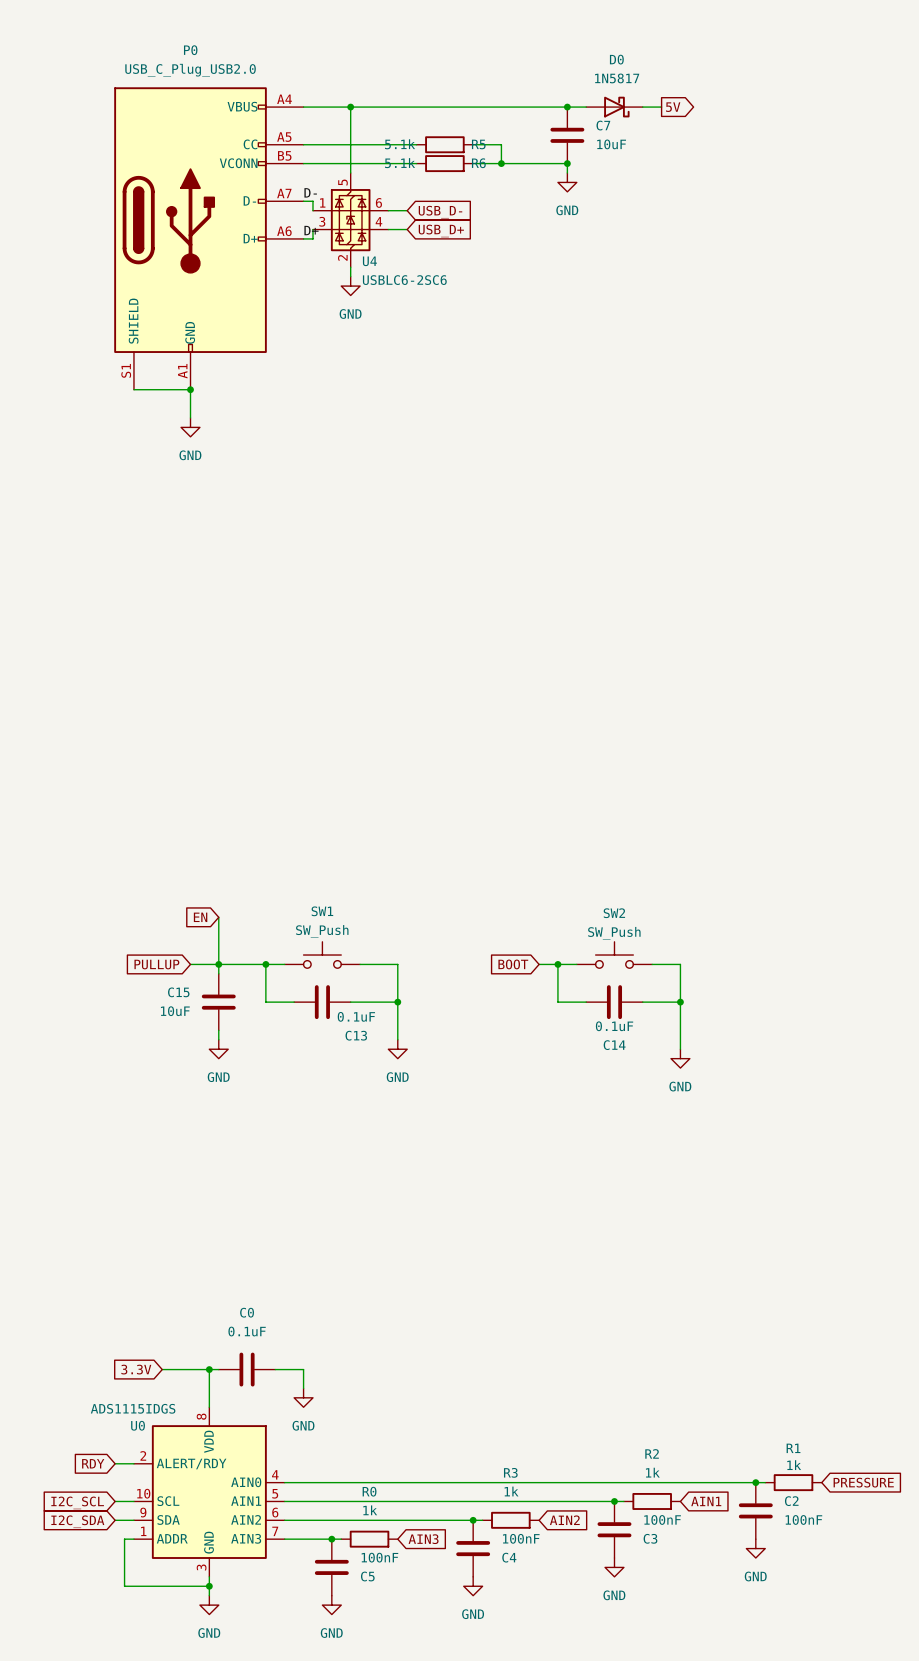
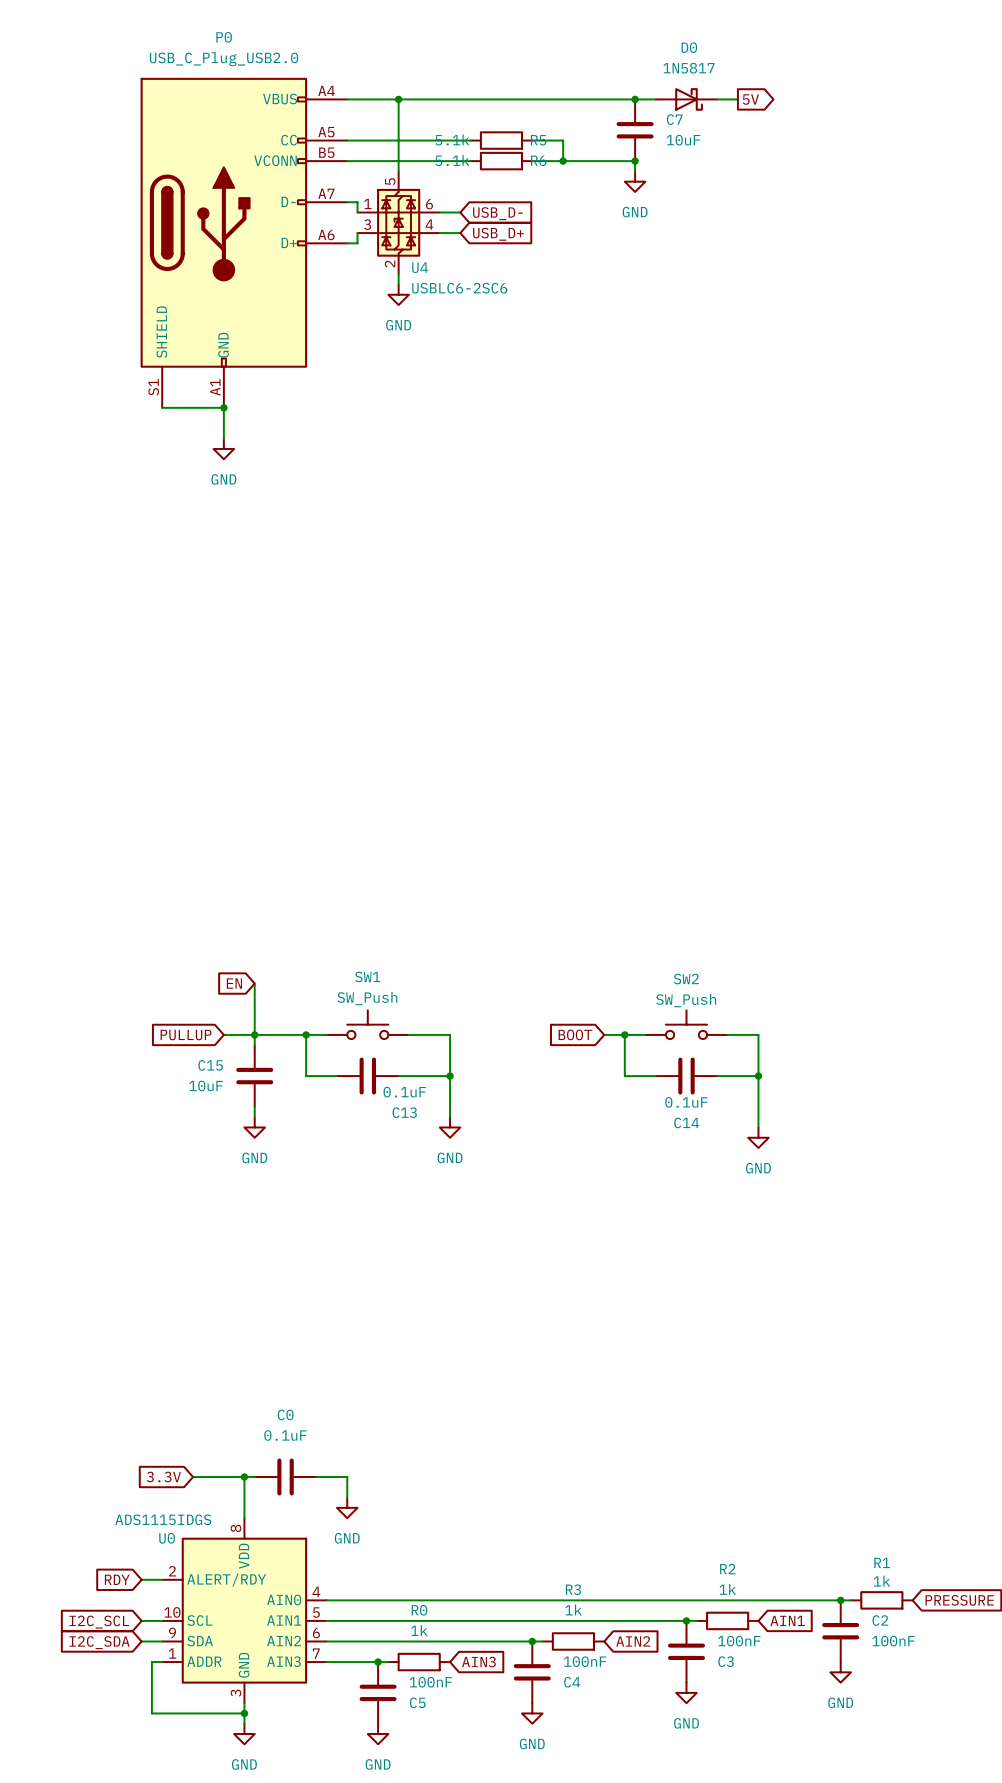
label: D- (310, 192) -> none
label: D+ (311, 230) -> none

